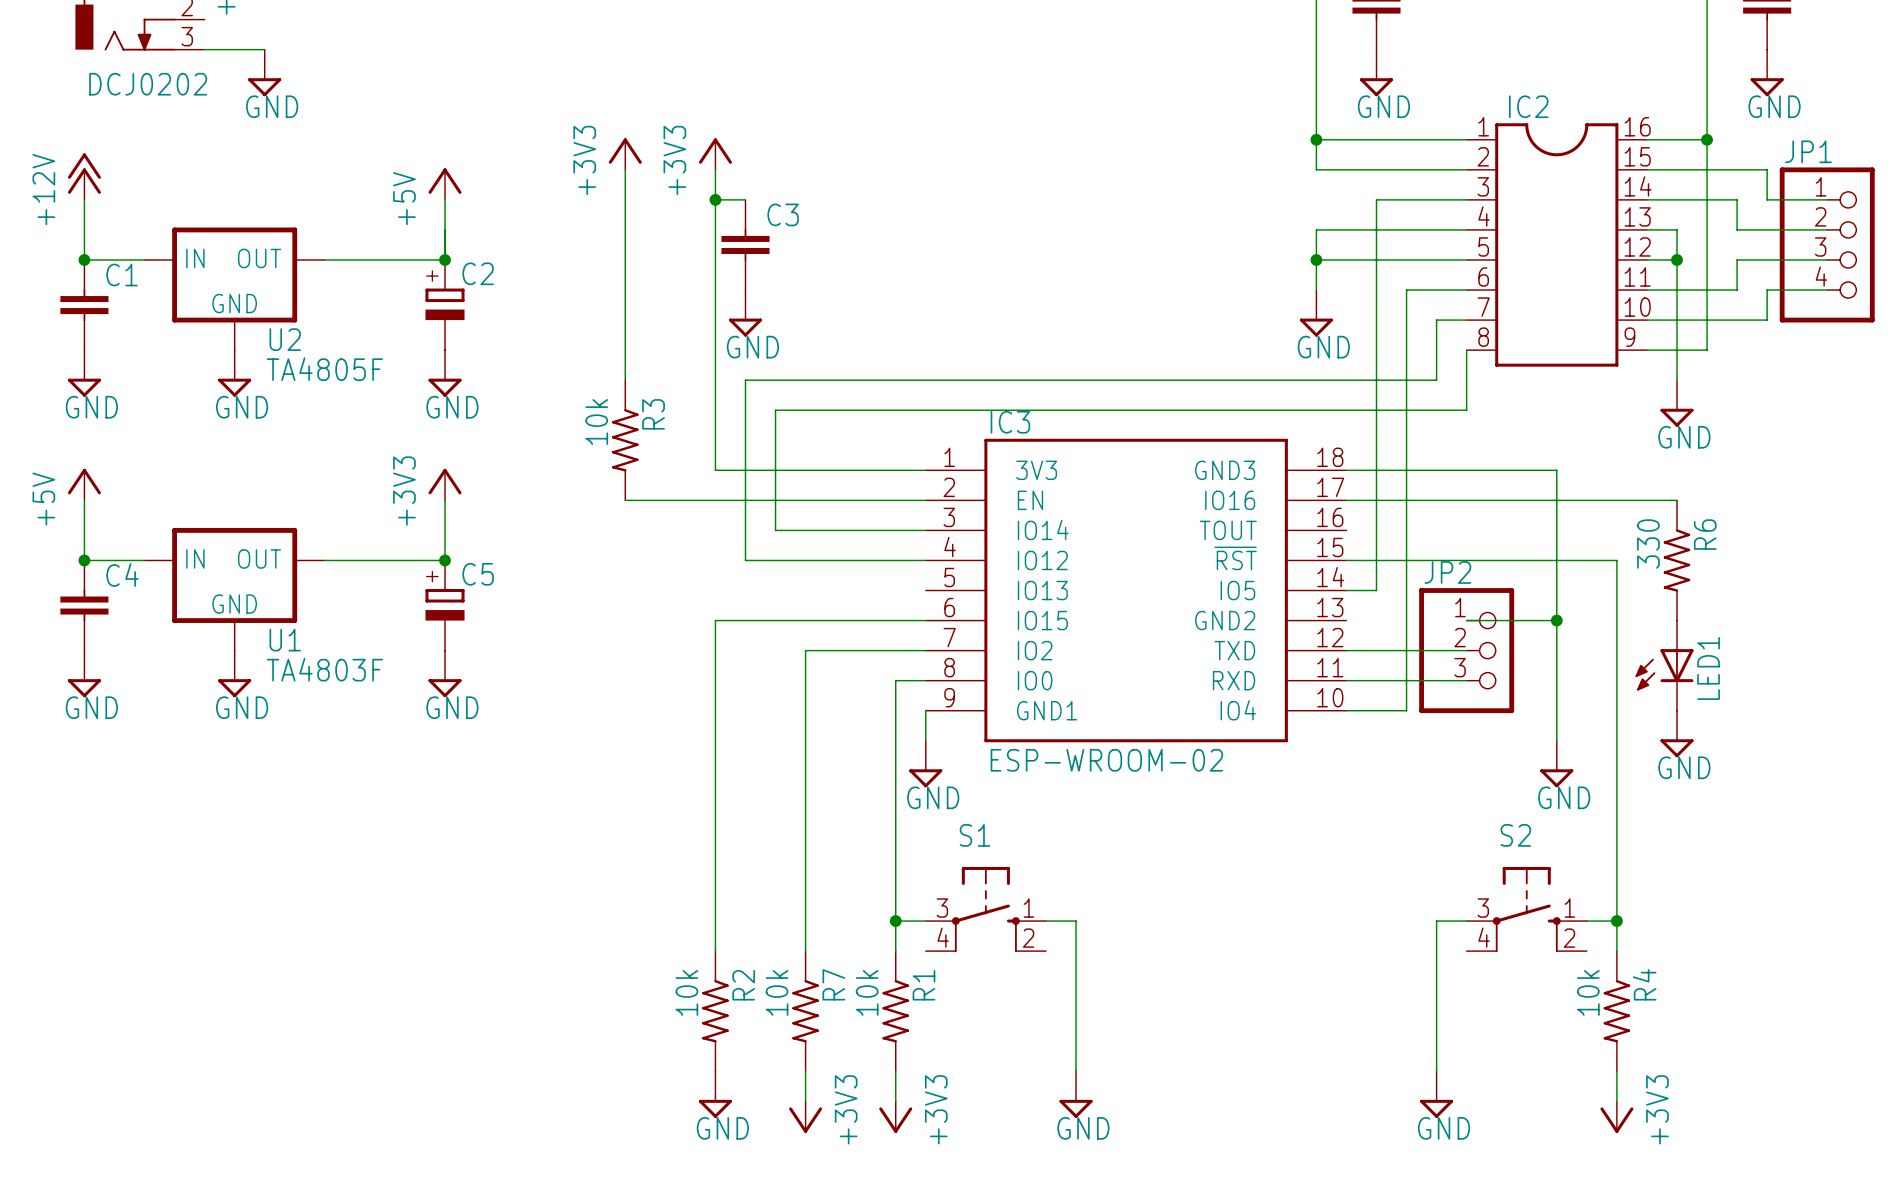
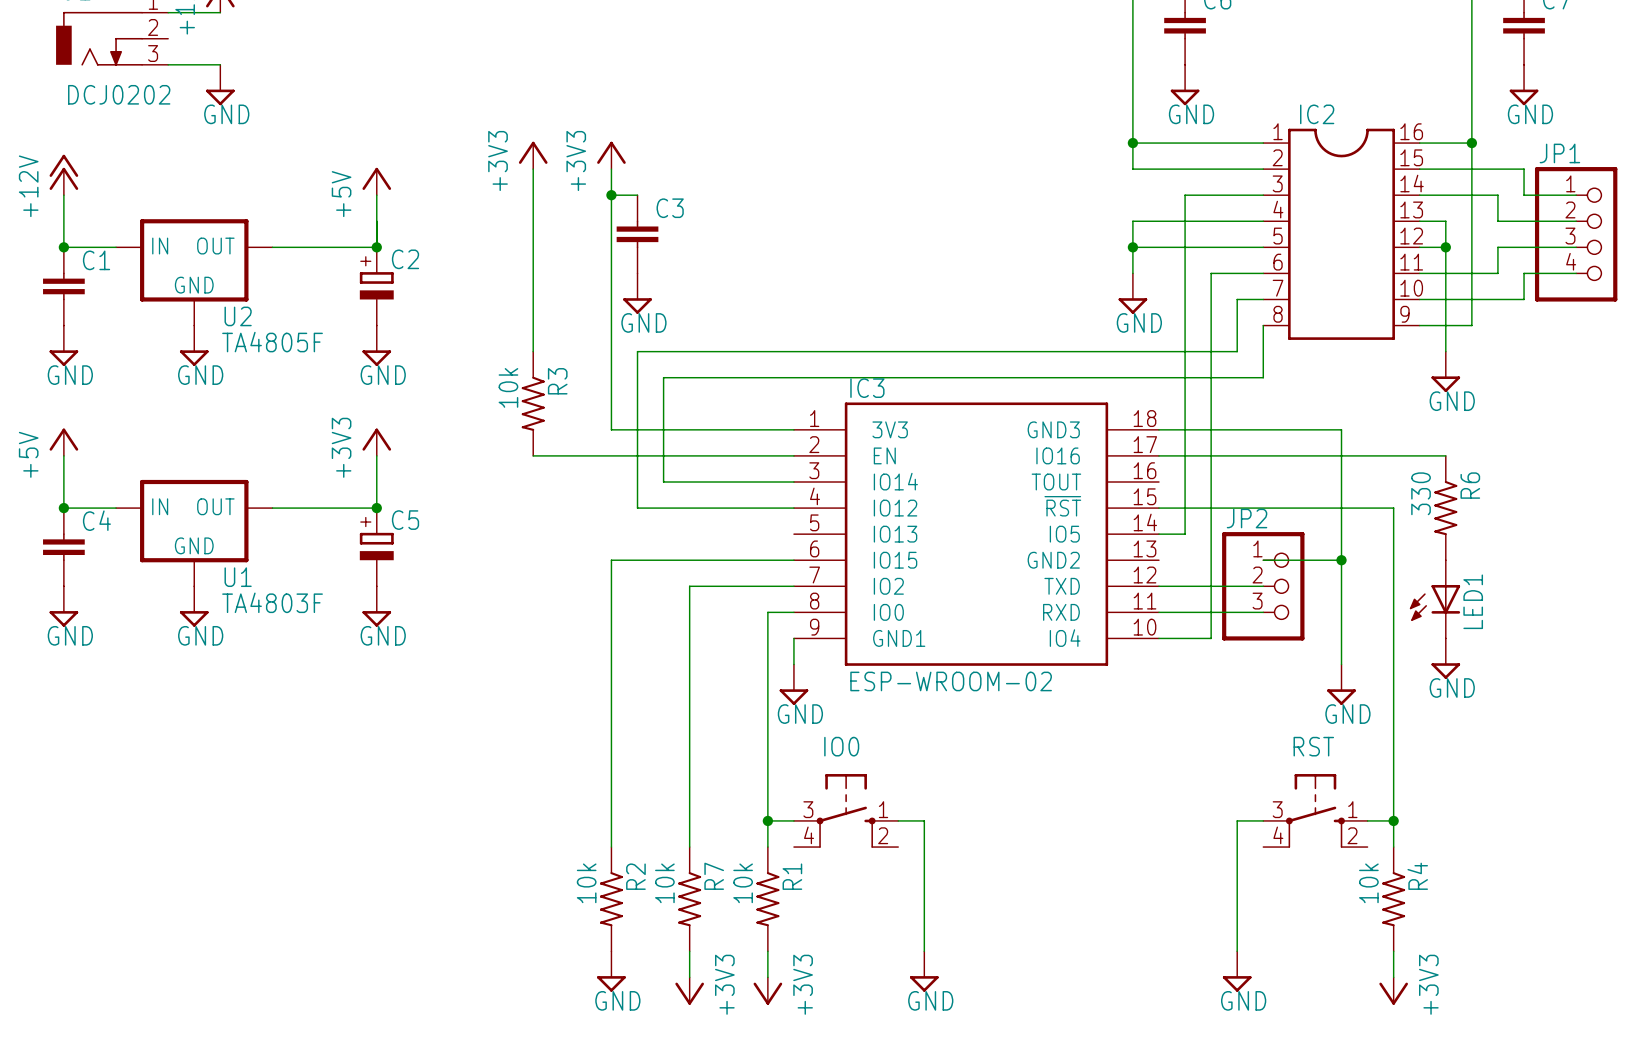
S1 name: S1 (974, 835) -> IO0 (841, 746)
S2 name: S2 (1515, 835) -> RST (1313, 746)

